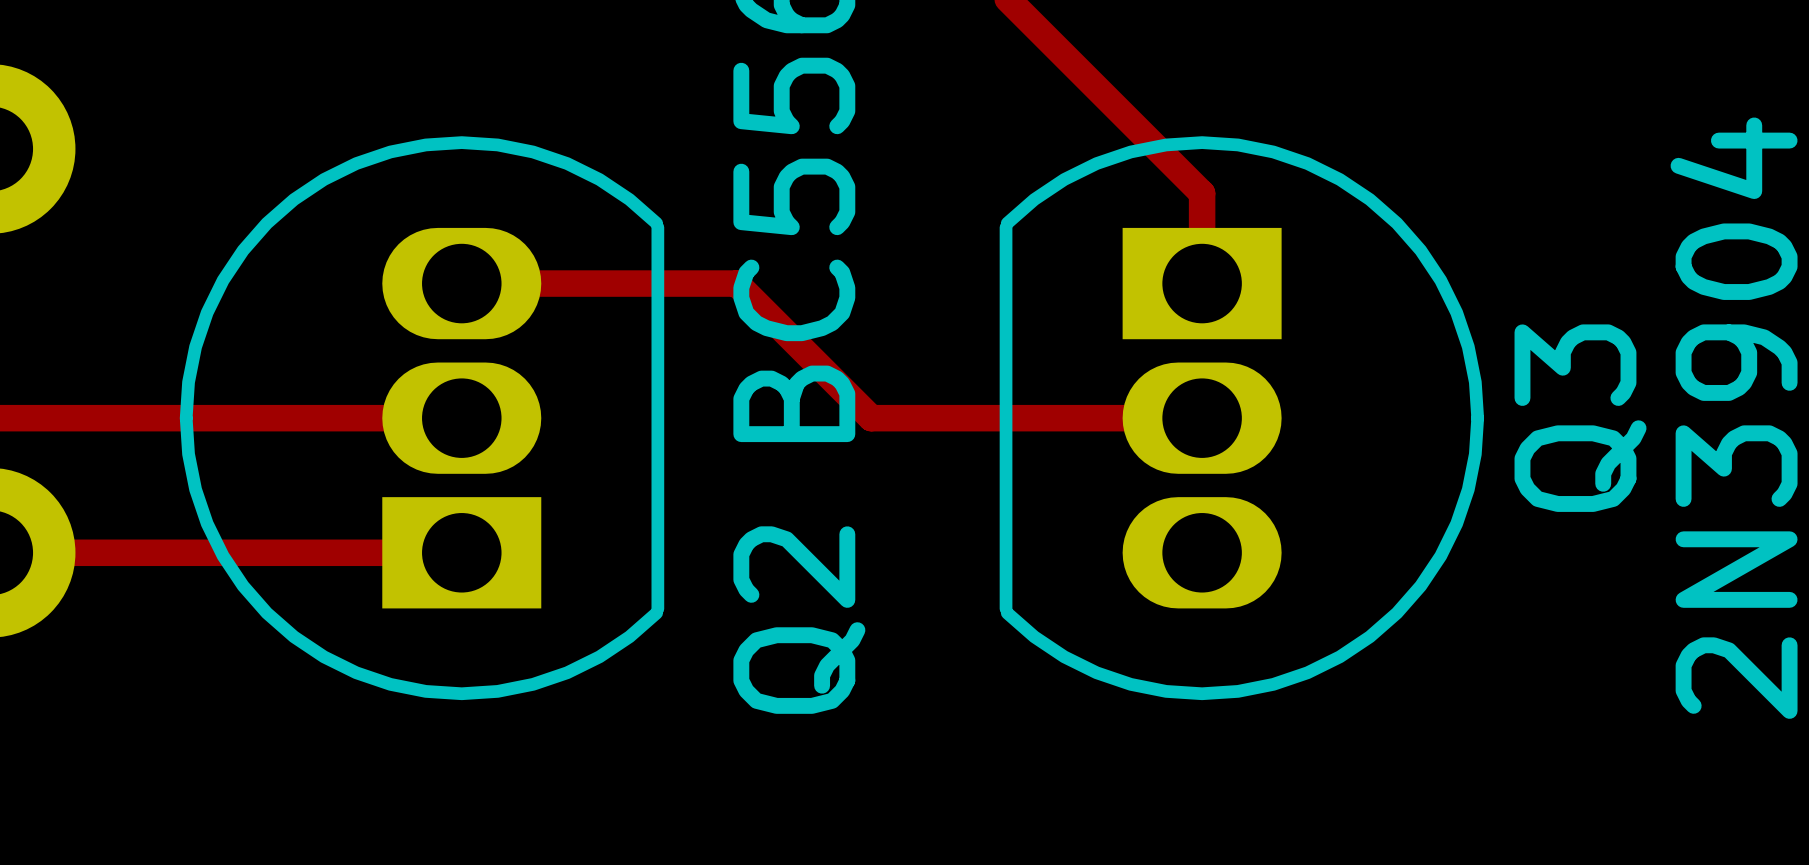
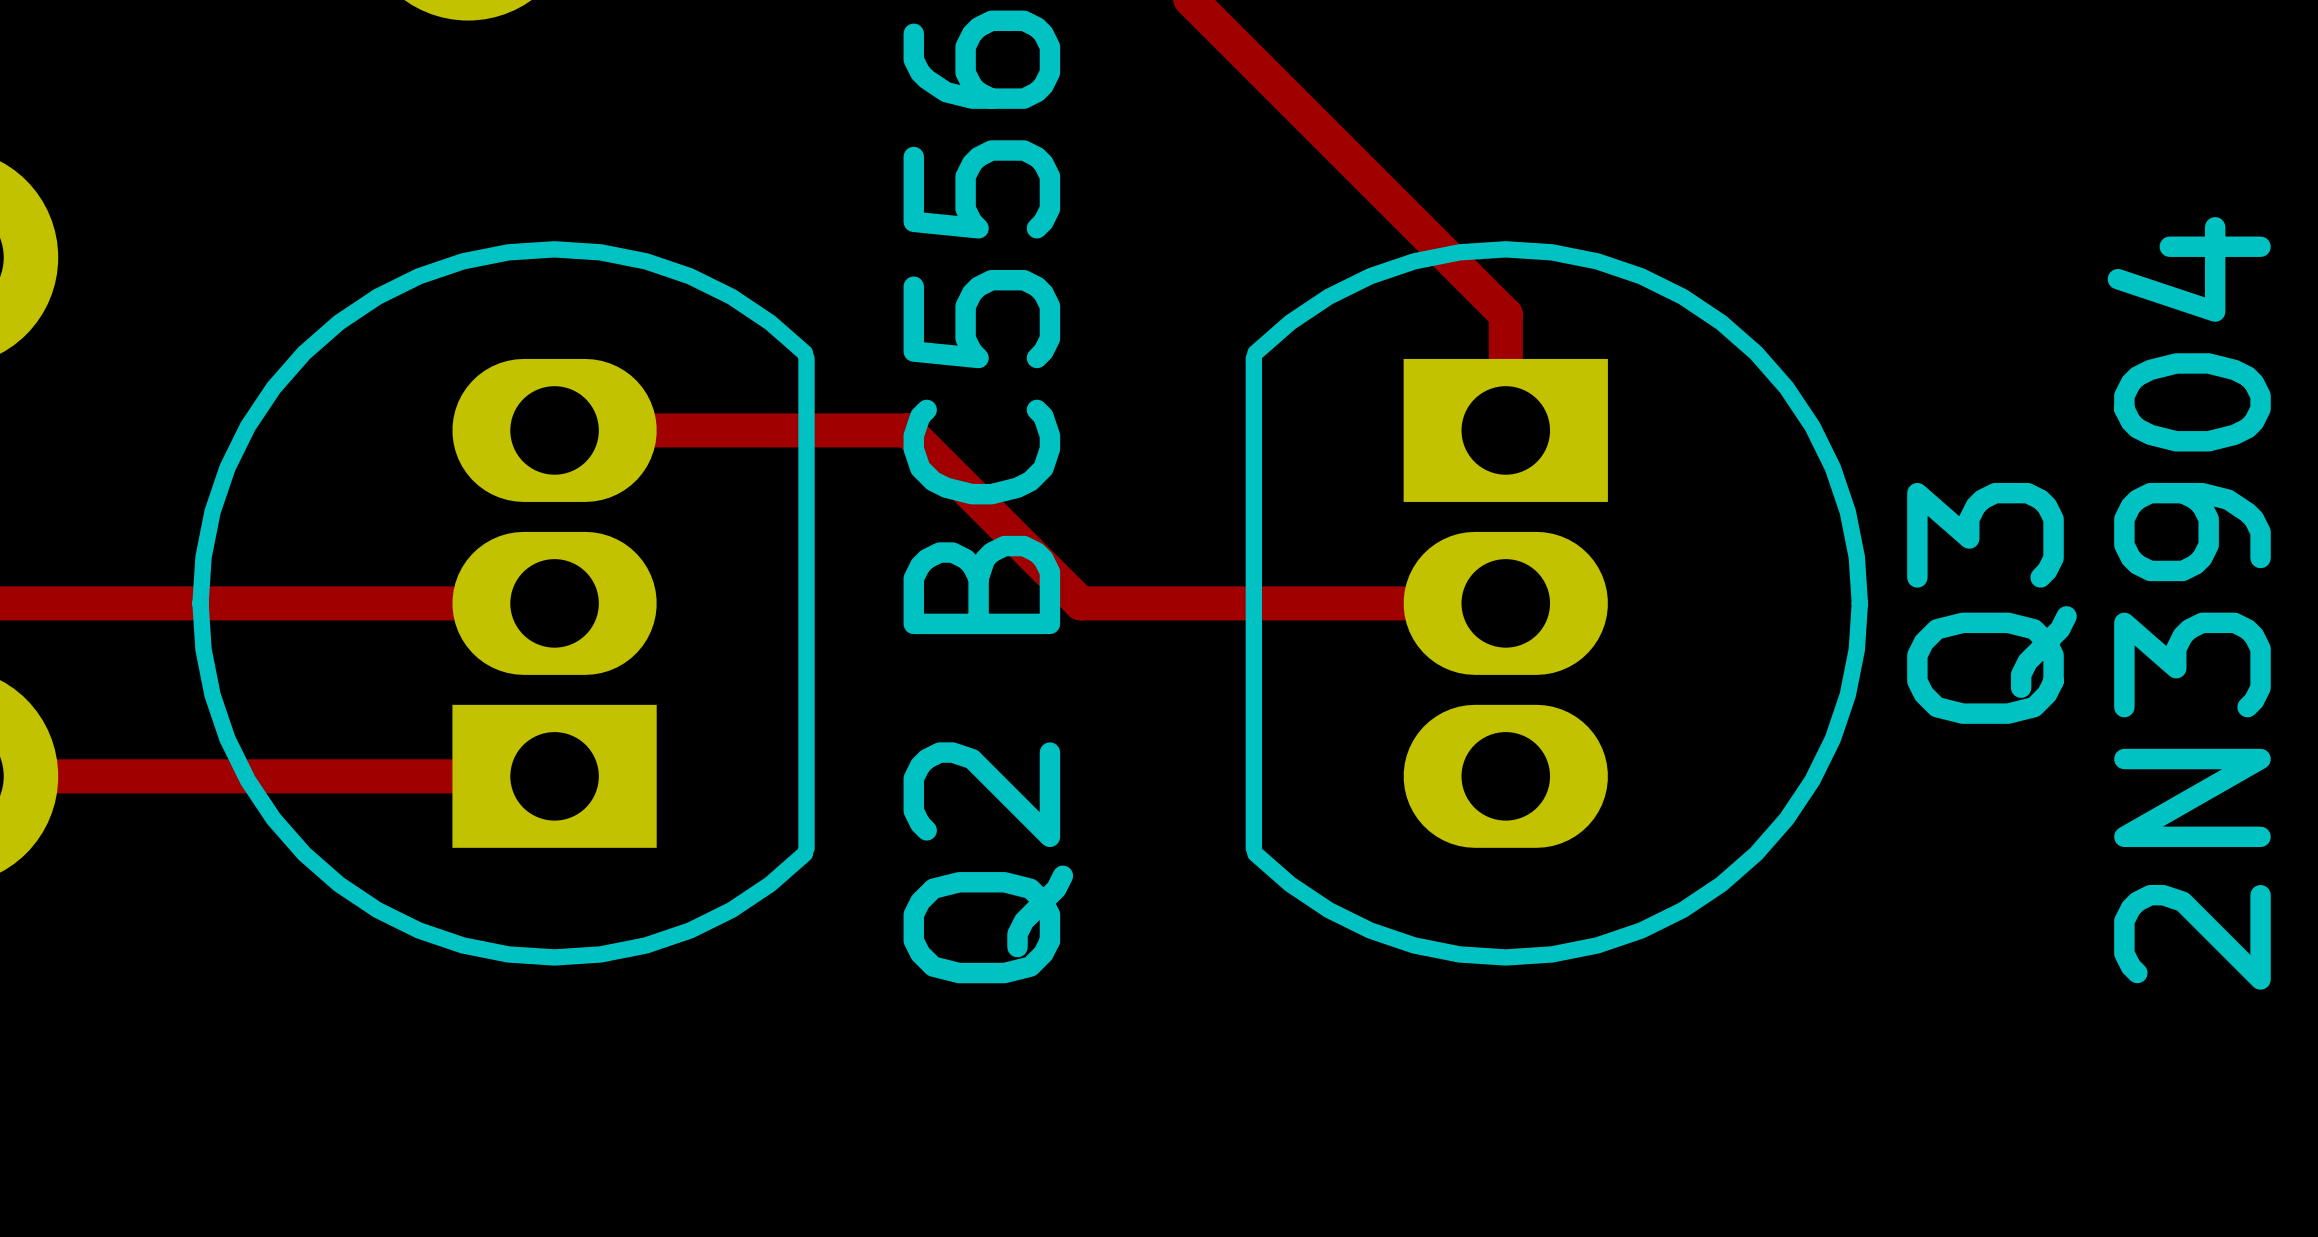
Q2 footprint: [179, 136, 665, 701] -> [192, 241, 815, 966]
Q3 footprint: [999, 136, 1485, 701] -> [1245, 241, 1869, 966]

